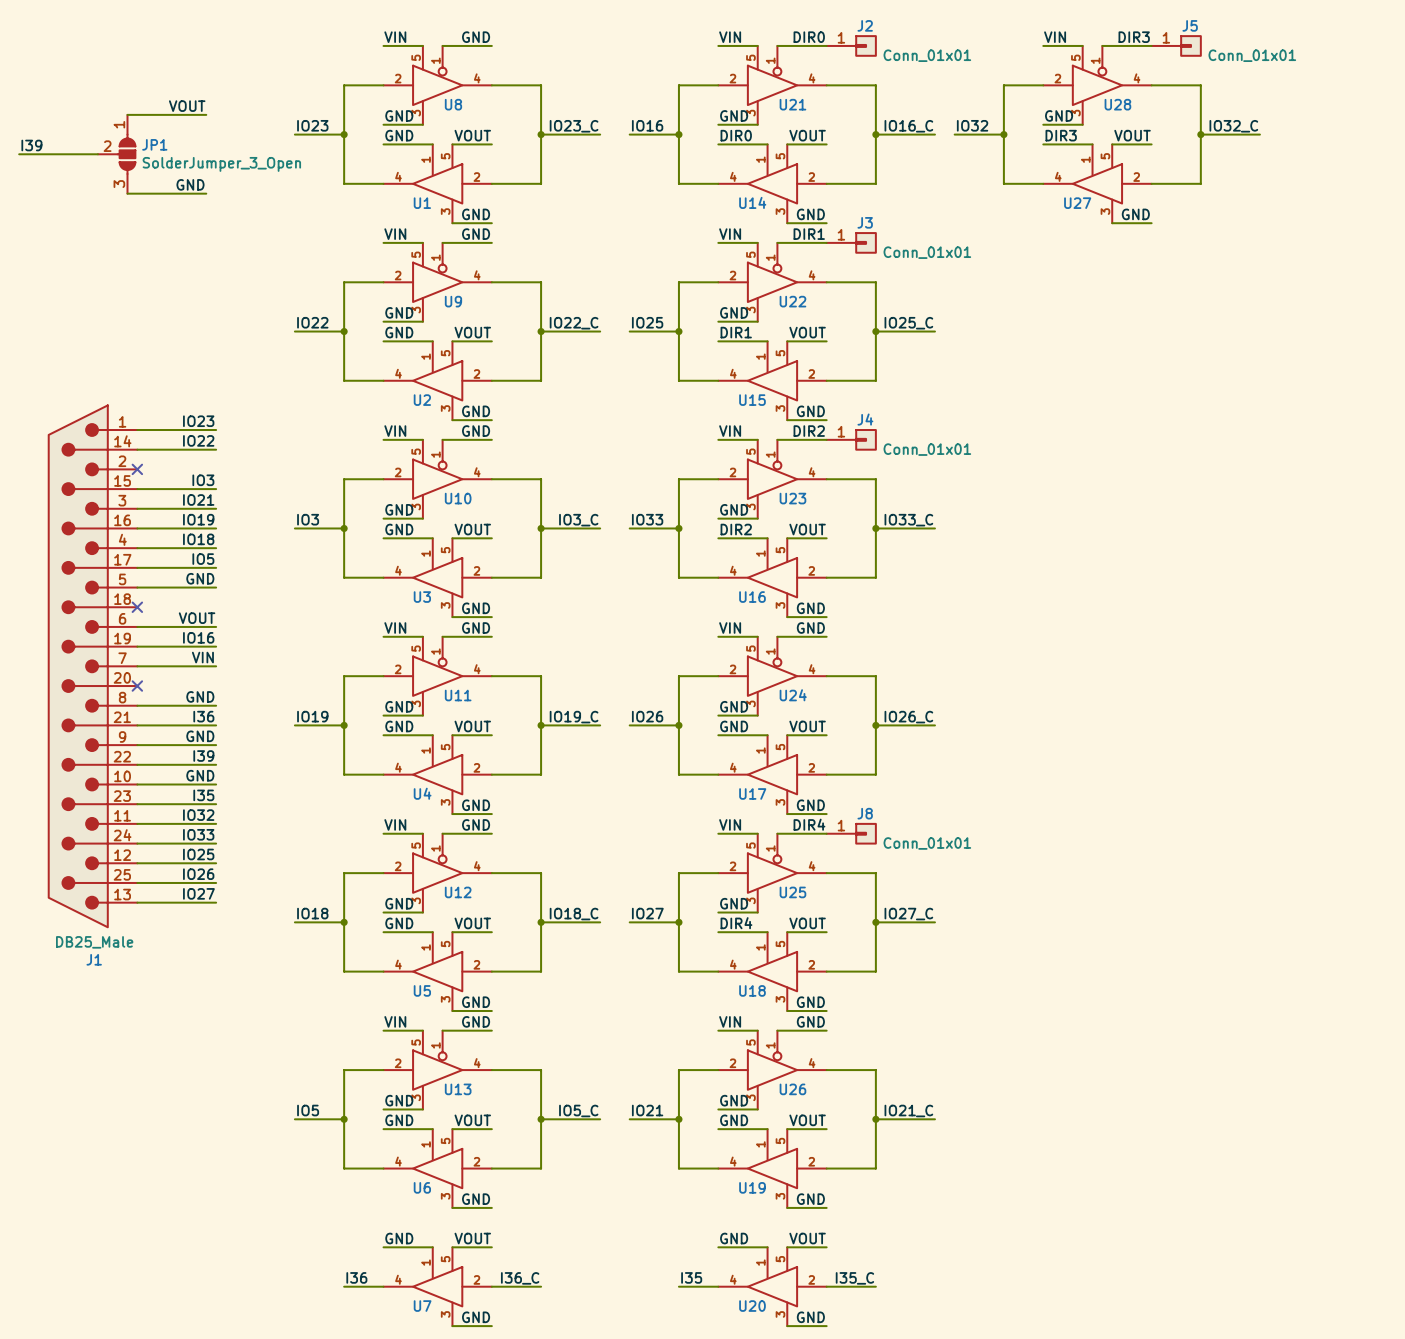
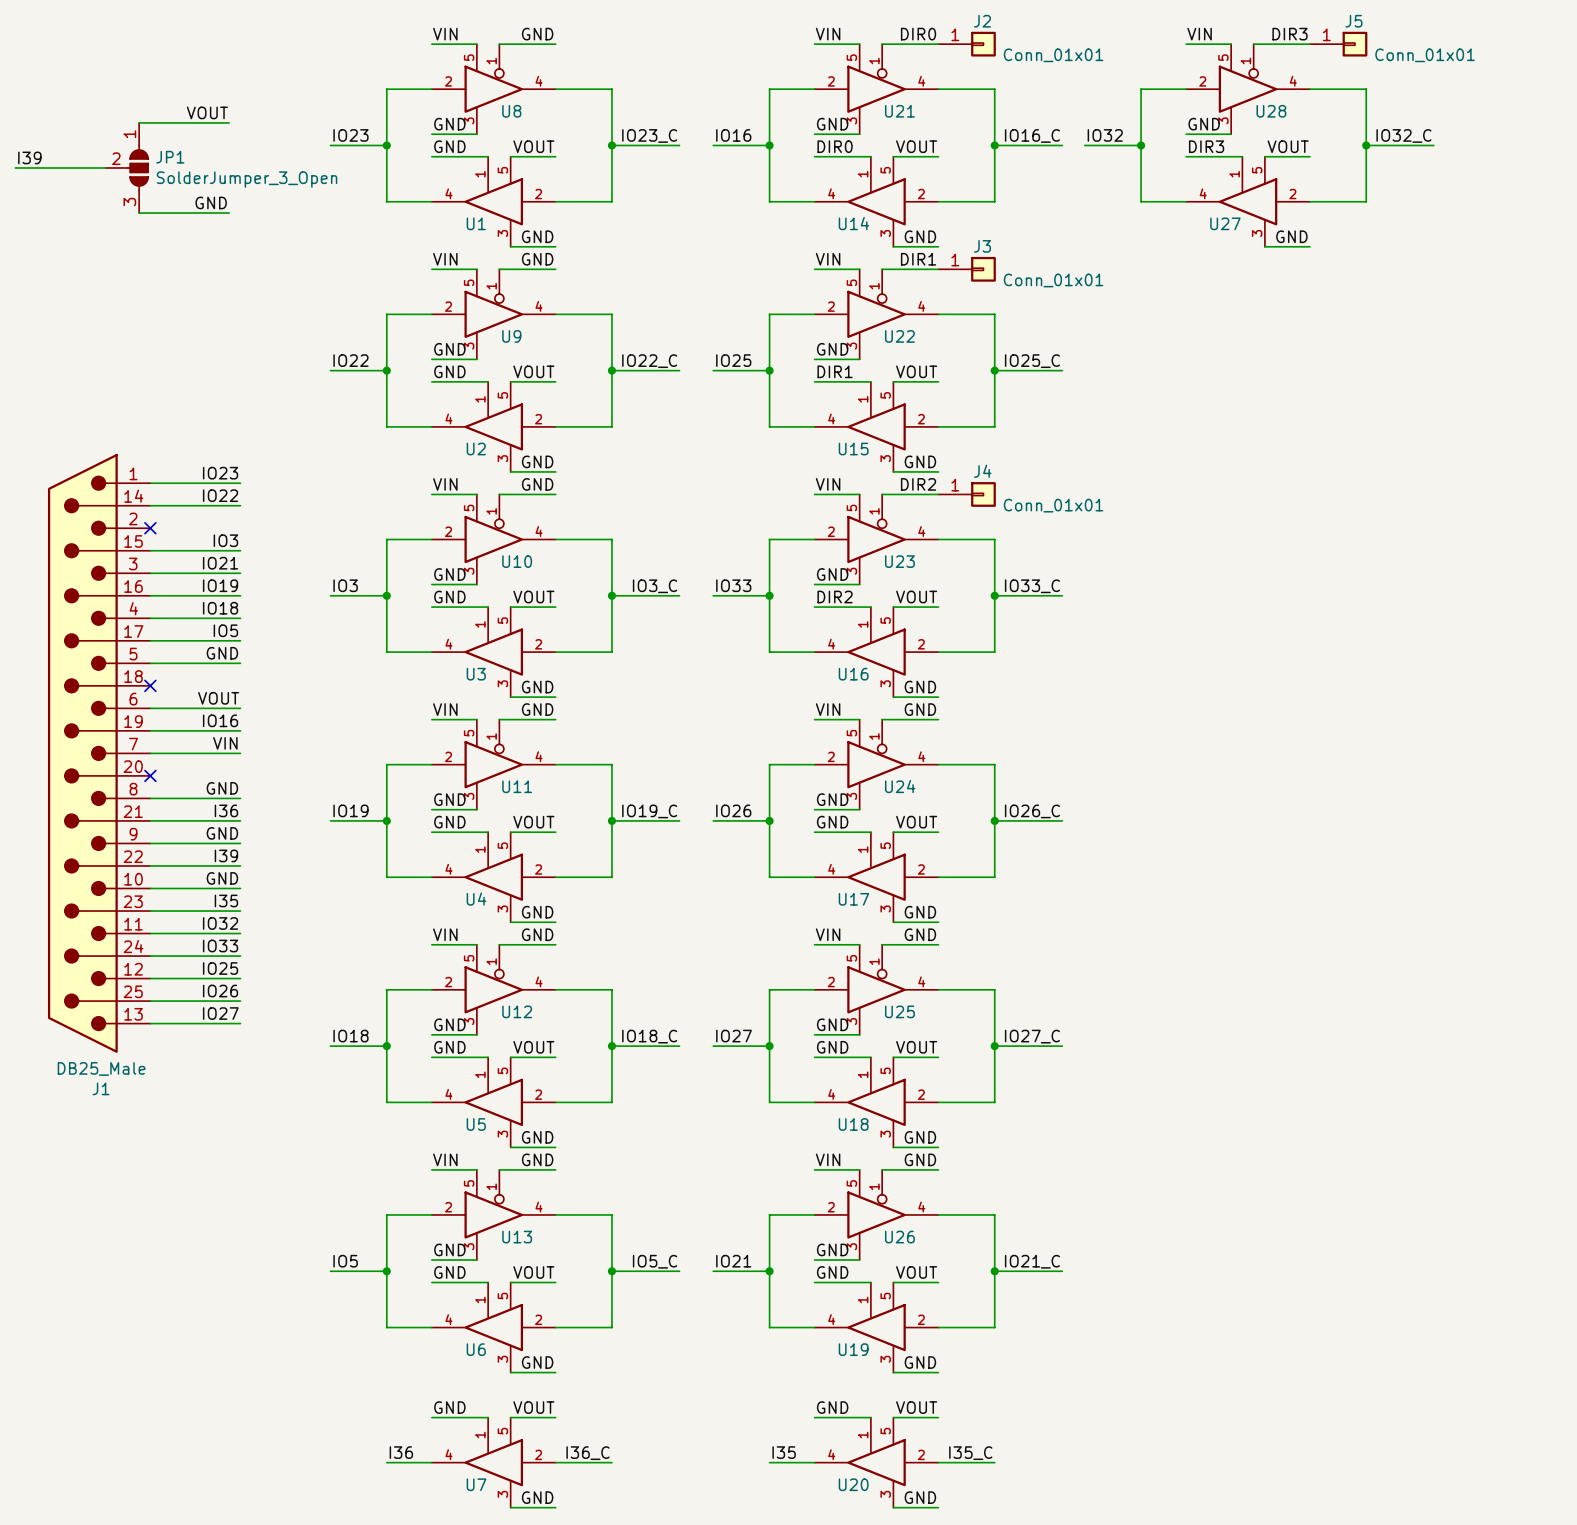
label: DIR4 (809, 824) -> GND (920, 934)
J8: Conn_01x01 (851, 833) -> none
label: DIR4 (736, 923) -> GND (832, 1047)

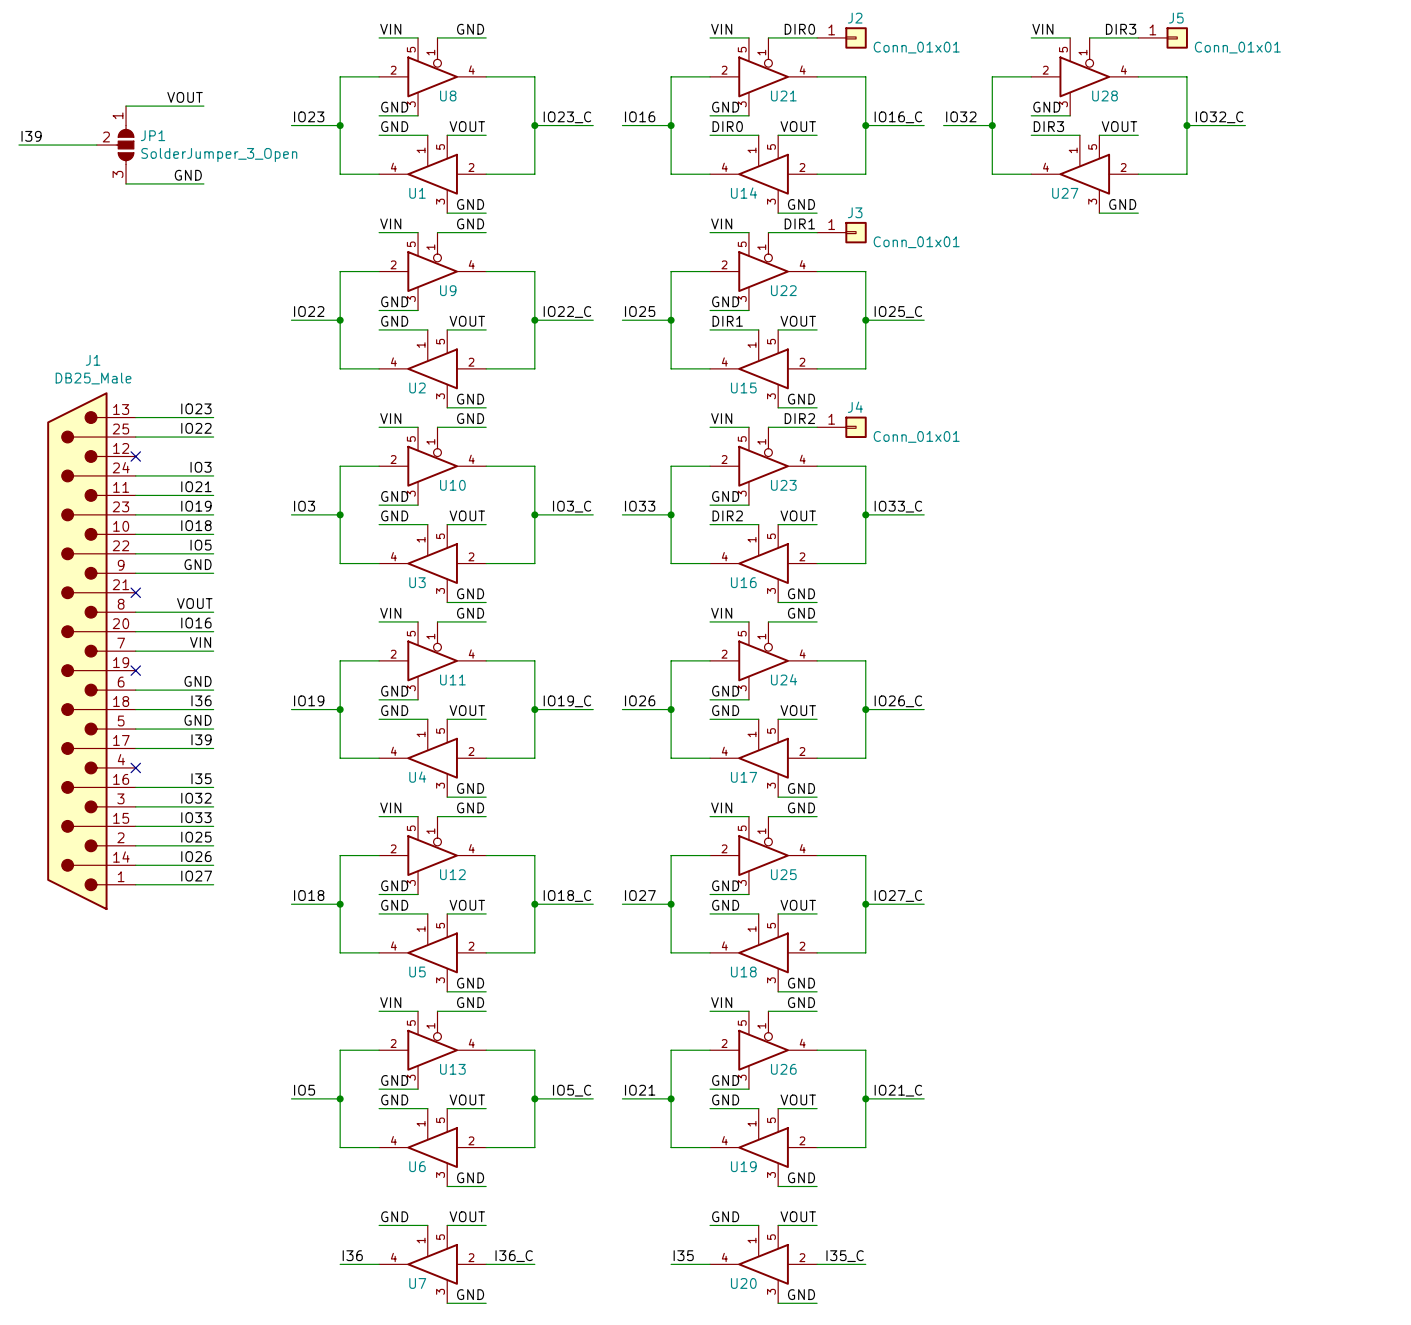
J1 flip: as is (82, 753) -> up-down (77, 651)
label: GND (222, 878) -> none
wire: (150, 888) (240, 888) -> none
no-connect mark: none -> (135, 767)

